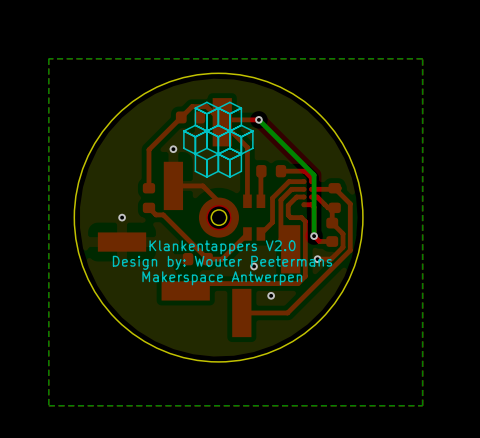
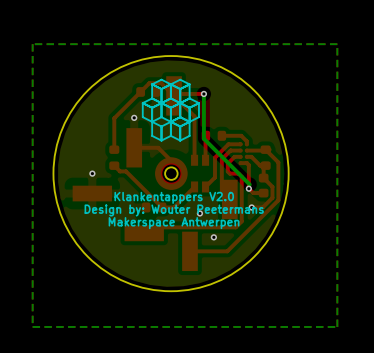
bottom track: (258, 119) (314, 175) (314, 236) -> (203, 93) (203, 138) (249, 184)

